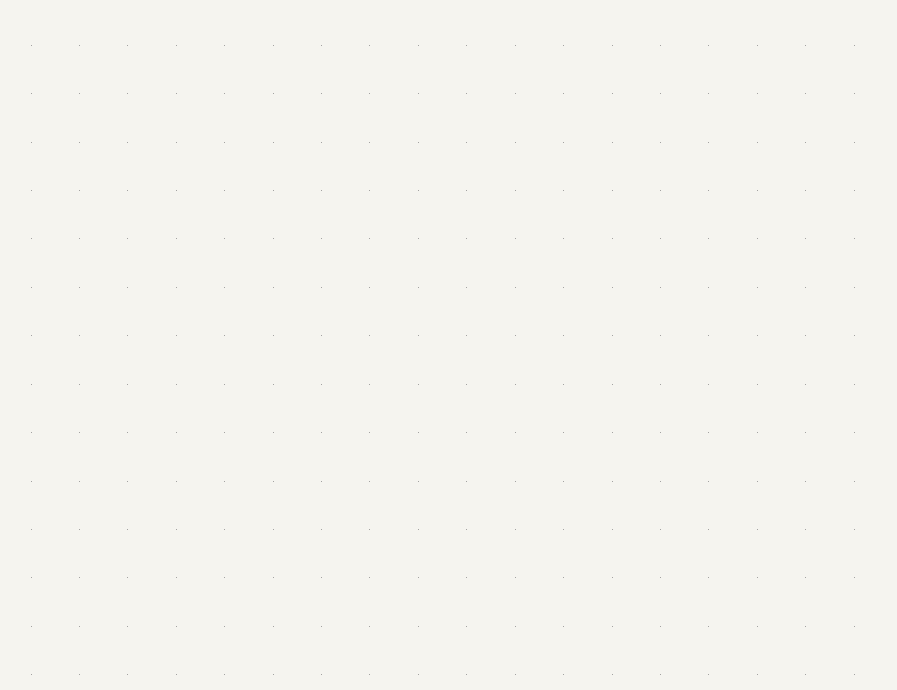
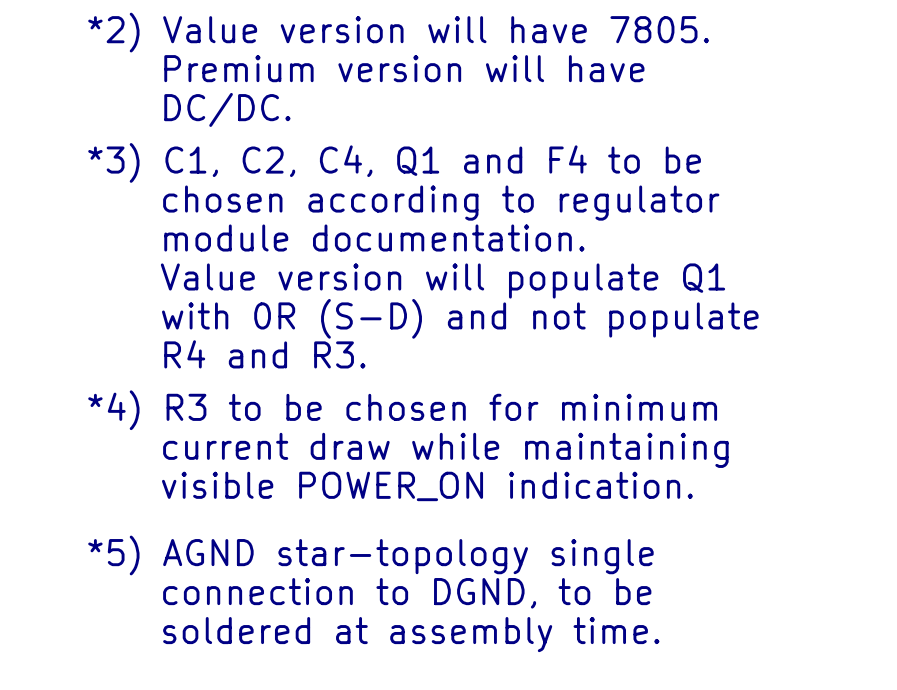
text: none -> *2) Value version will have 7805. (398, 32)
text: none -> Premium version will have (404, 68)
text: none -> DC/DC. (227, 109)
text: none -> *3) C1, C2, C4, Q1 and F4 to be (394, 162)
text: none -> chosen according to regulator (441, 203)
text: none -> module documentation. (374, 238)
text: none -> Value version will populate Q1 (442, 281)
text: none -> with 0R (S-D) and not populate (460, 318)
text: none -> R4 and R3. (264, 354)
text: none -> *4) R3 to be chosen for minimum (402, 410)
text: none -> current draw while maintaining (445, 450)
text: none -> visible POWER_ON indication. (427, 486)
text: none -> *5) AGND star-topology single (370, 555)
text: none -> connection to DGND, to be (407, 593)
text: none -> soldered at assembly time. (411, 634)

